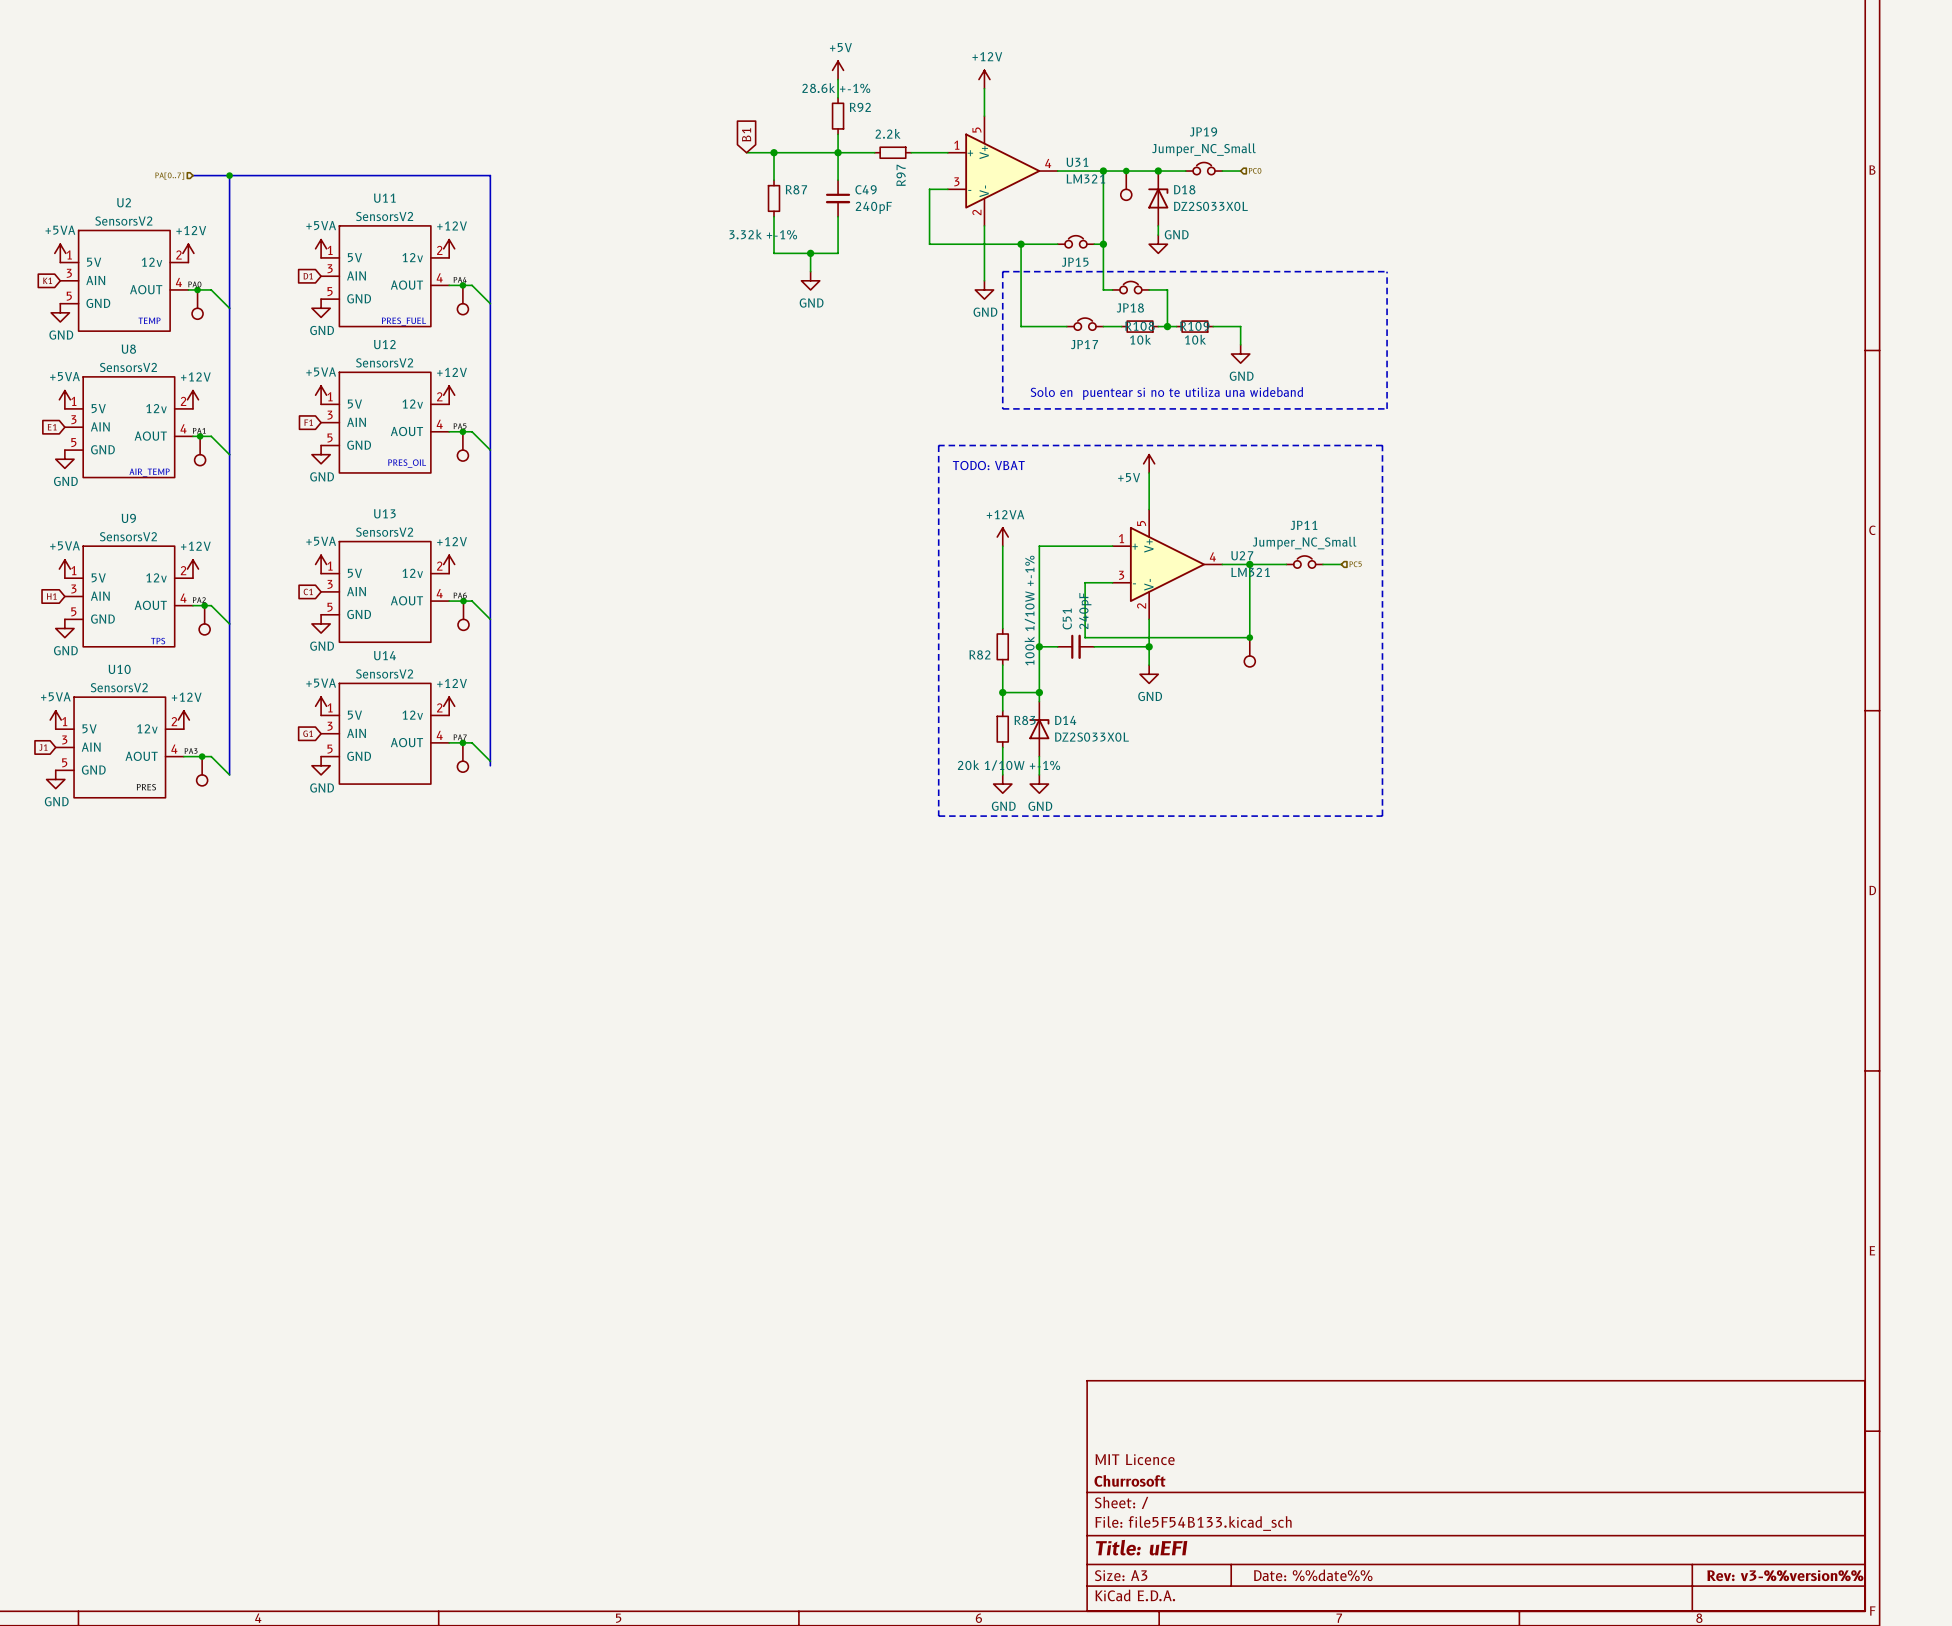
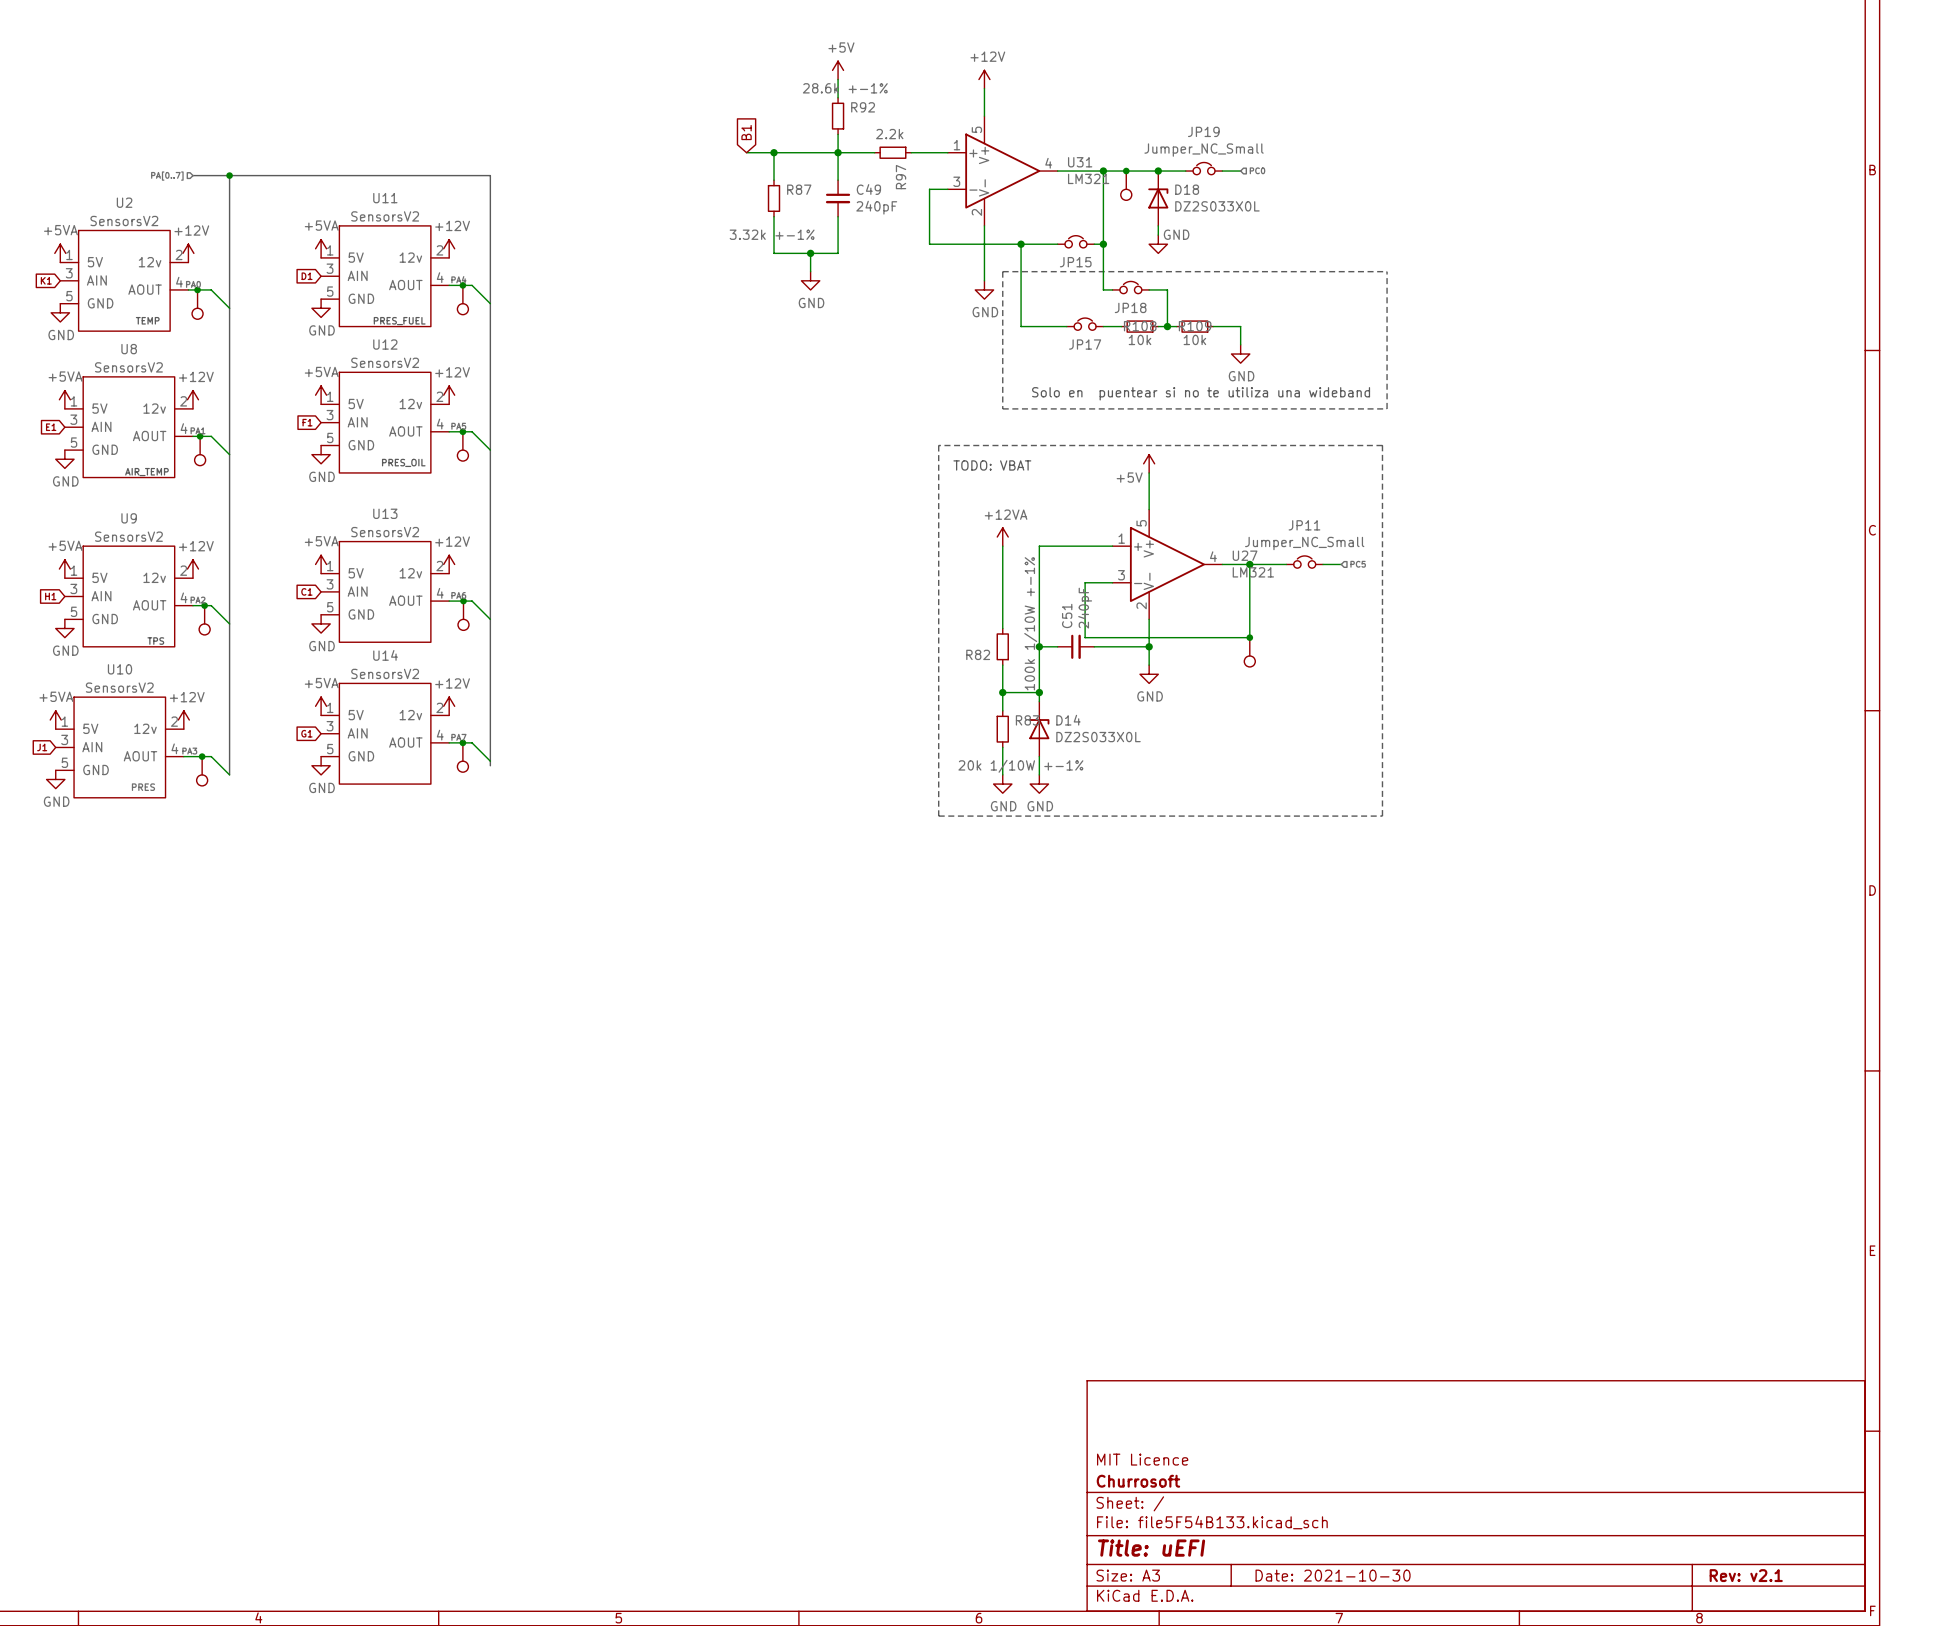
title block: Date: %%date%% (1313, 1575) -> Date: 2021-10-30 (1333, 1575)
title block: Rev: v3-%%version%% (1785, 1575) -> Rev: v2.1 (1746, 1575)

